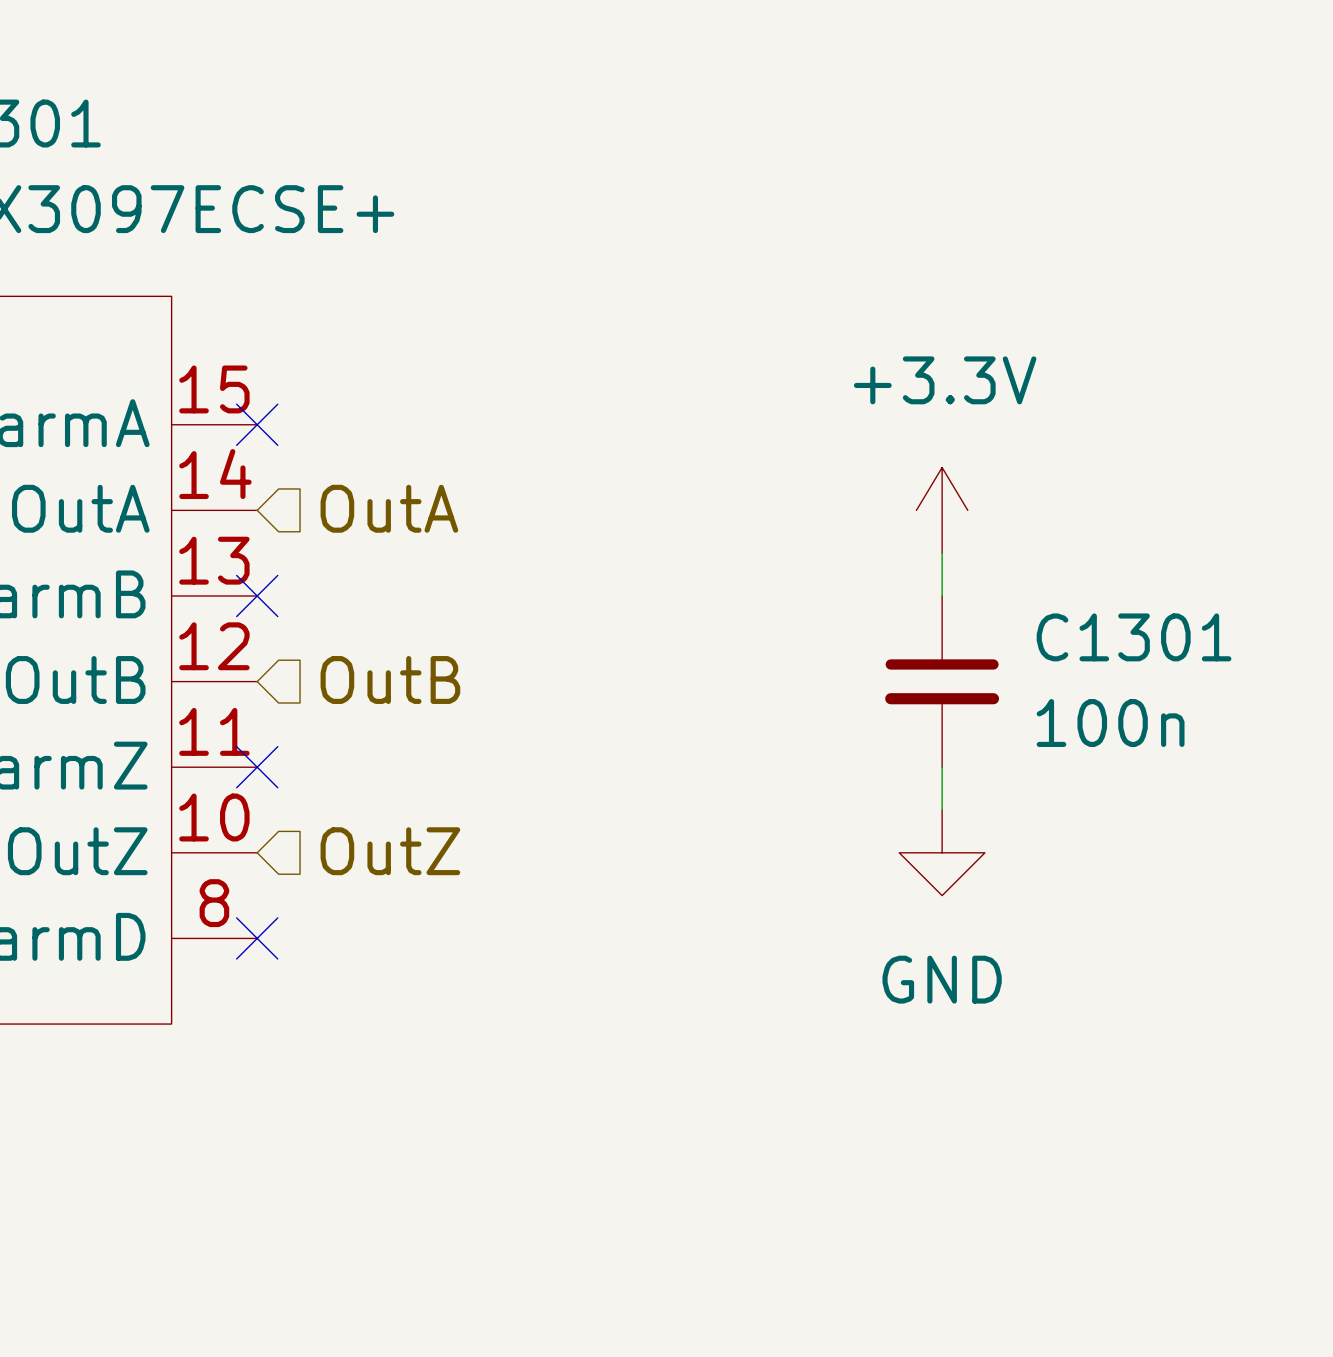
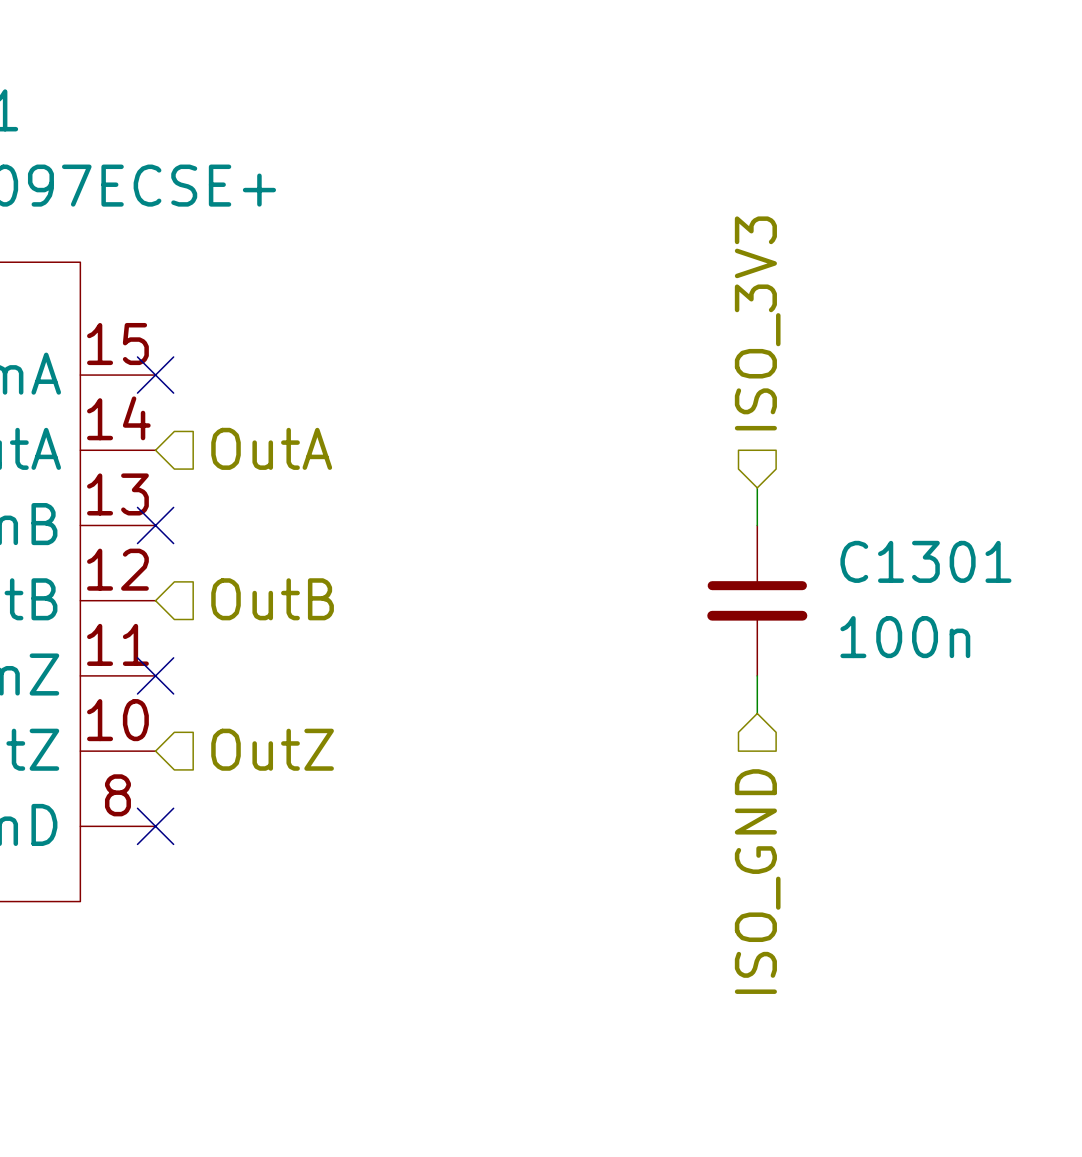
hierarchical label: none -> ISO_3V3 (757, 323)
power symbol: +3.3V (942, 510) -> none
power symbol: GND (942, 852) -> none
hierarchical label: none -> ISO_GND (757, 881)

